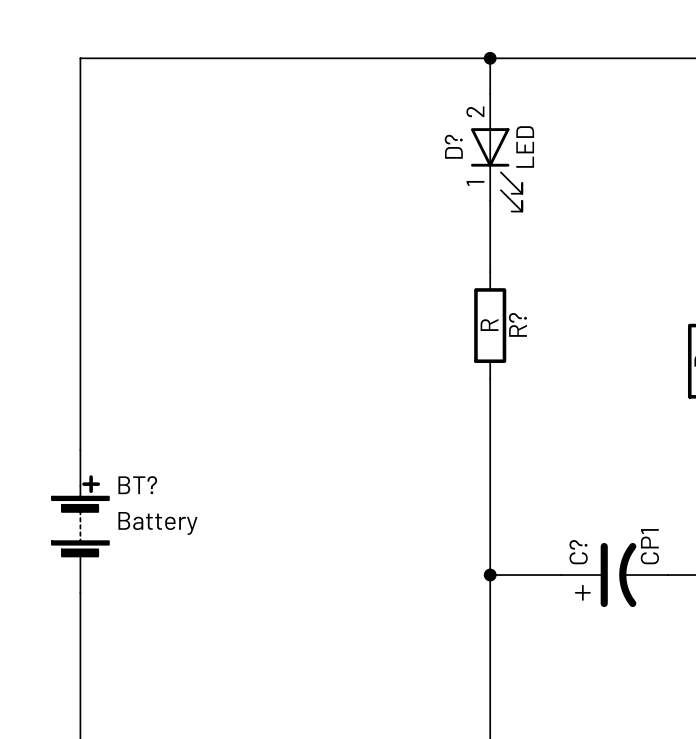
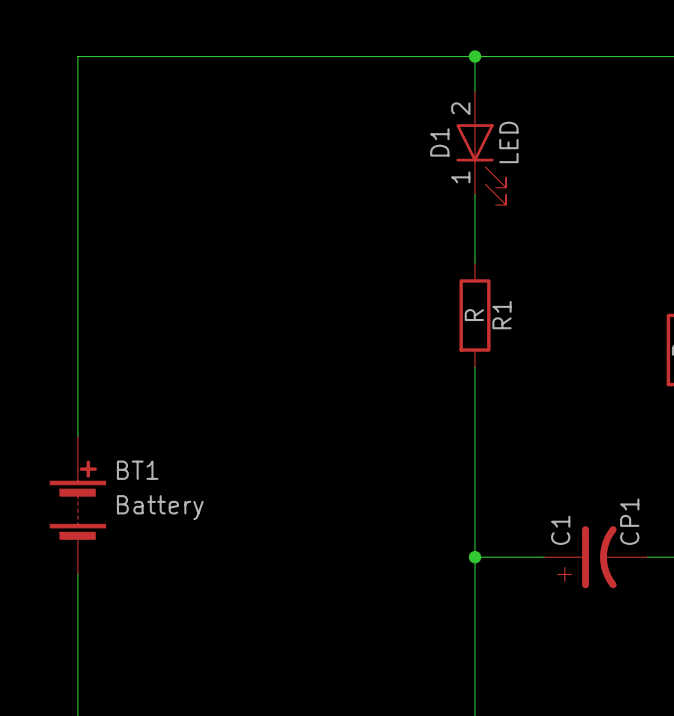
D? name: D? (453, 146) -> D1 (439, 142)
R? name: R? (517, 324) -> R1 (502, 315)
BT? name: BT? (137, 485) -> BT1 (137, 470)
C? name: C? (578, 552) -> C1 (560, 530)

